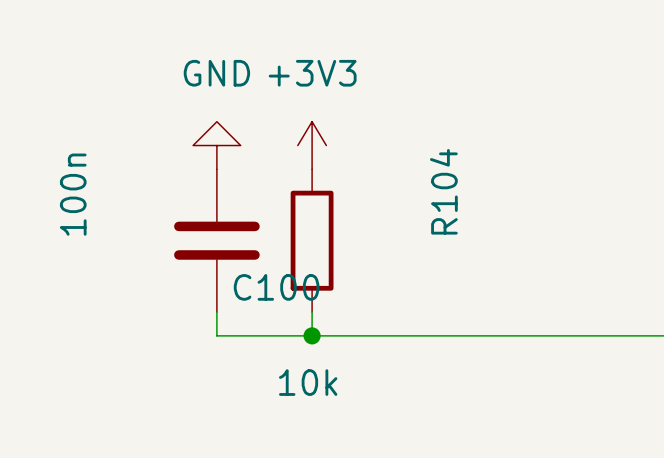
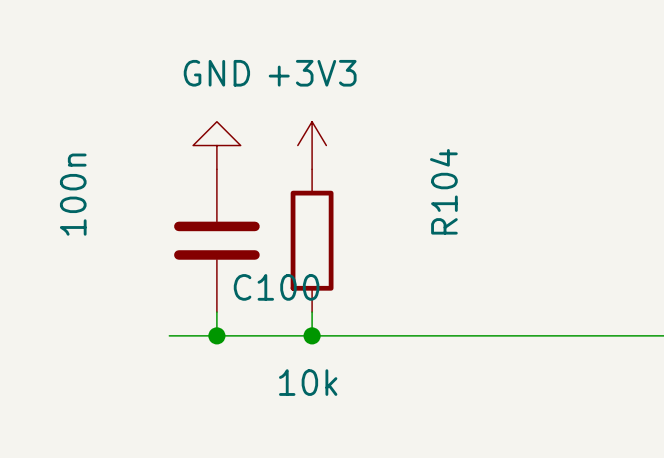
wire: none -> (169, 335) (216, 335)
junction: none -> (216, 335)

